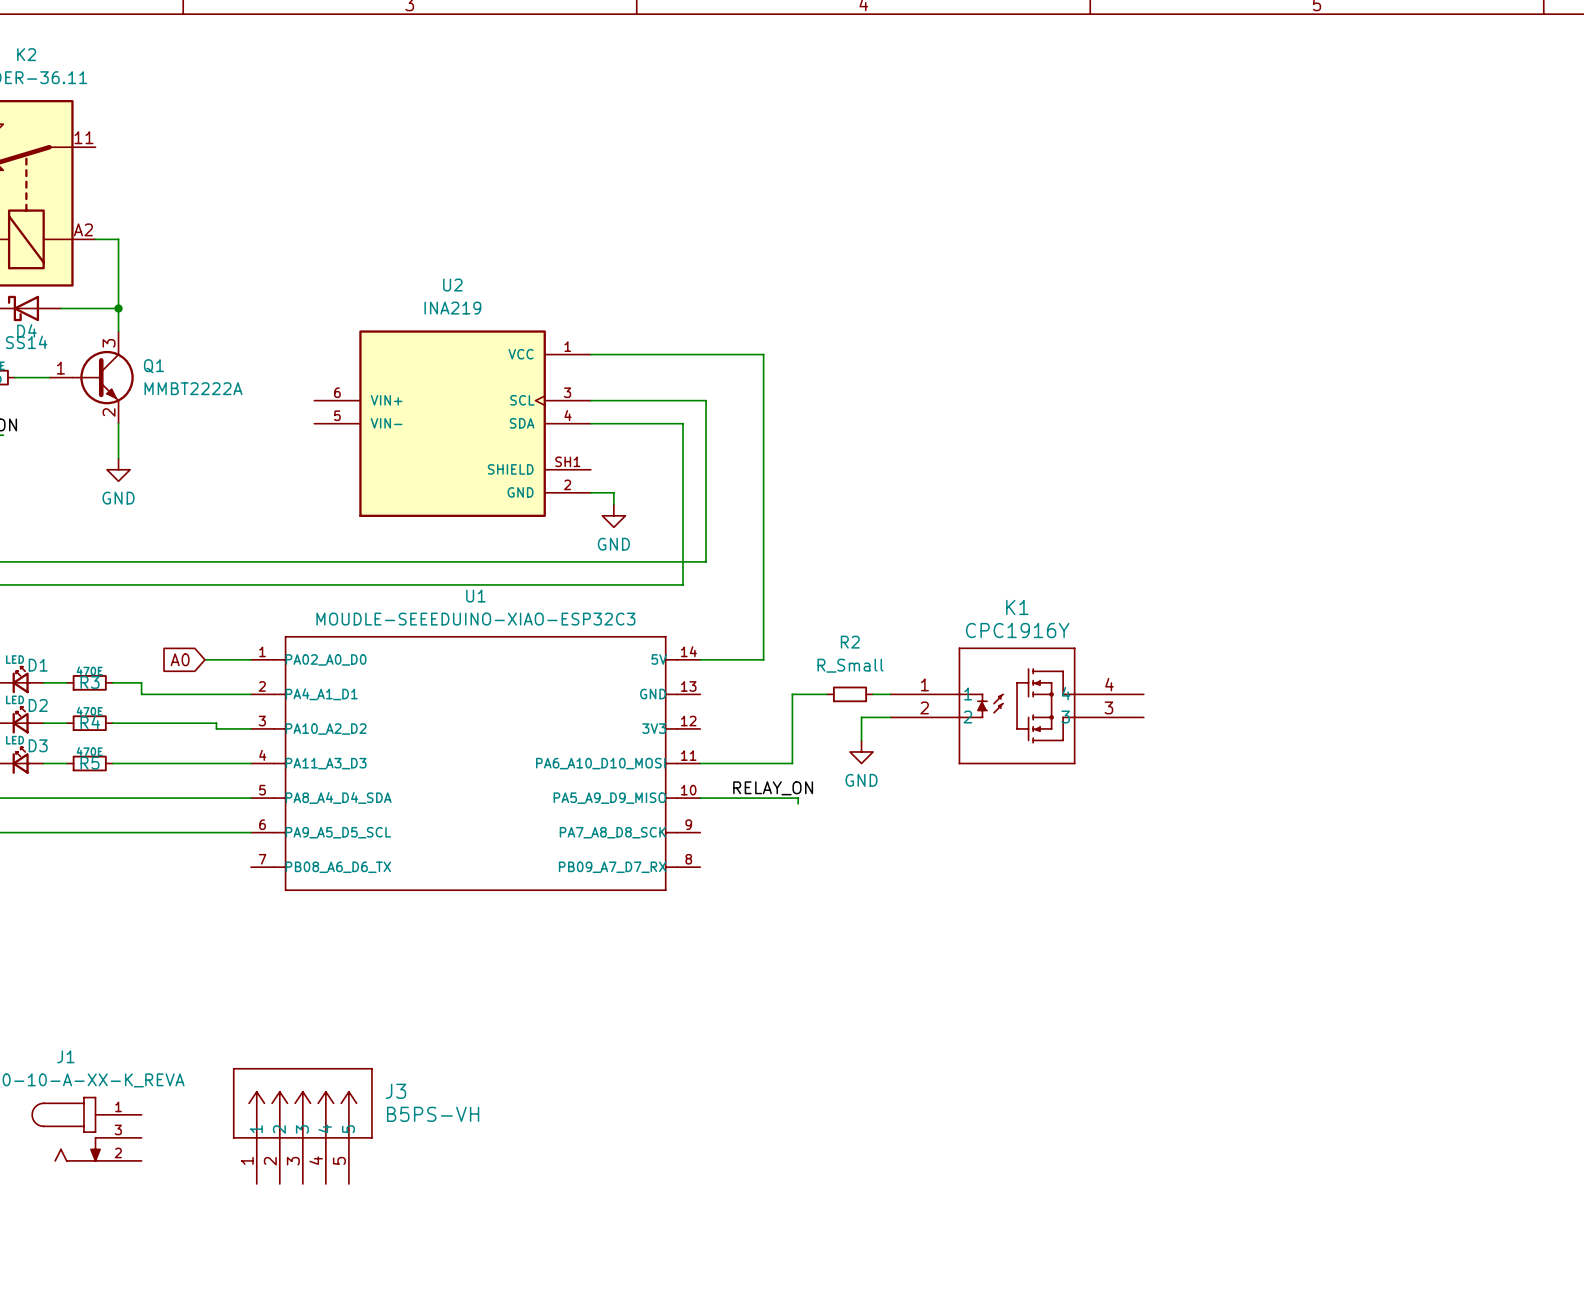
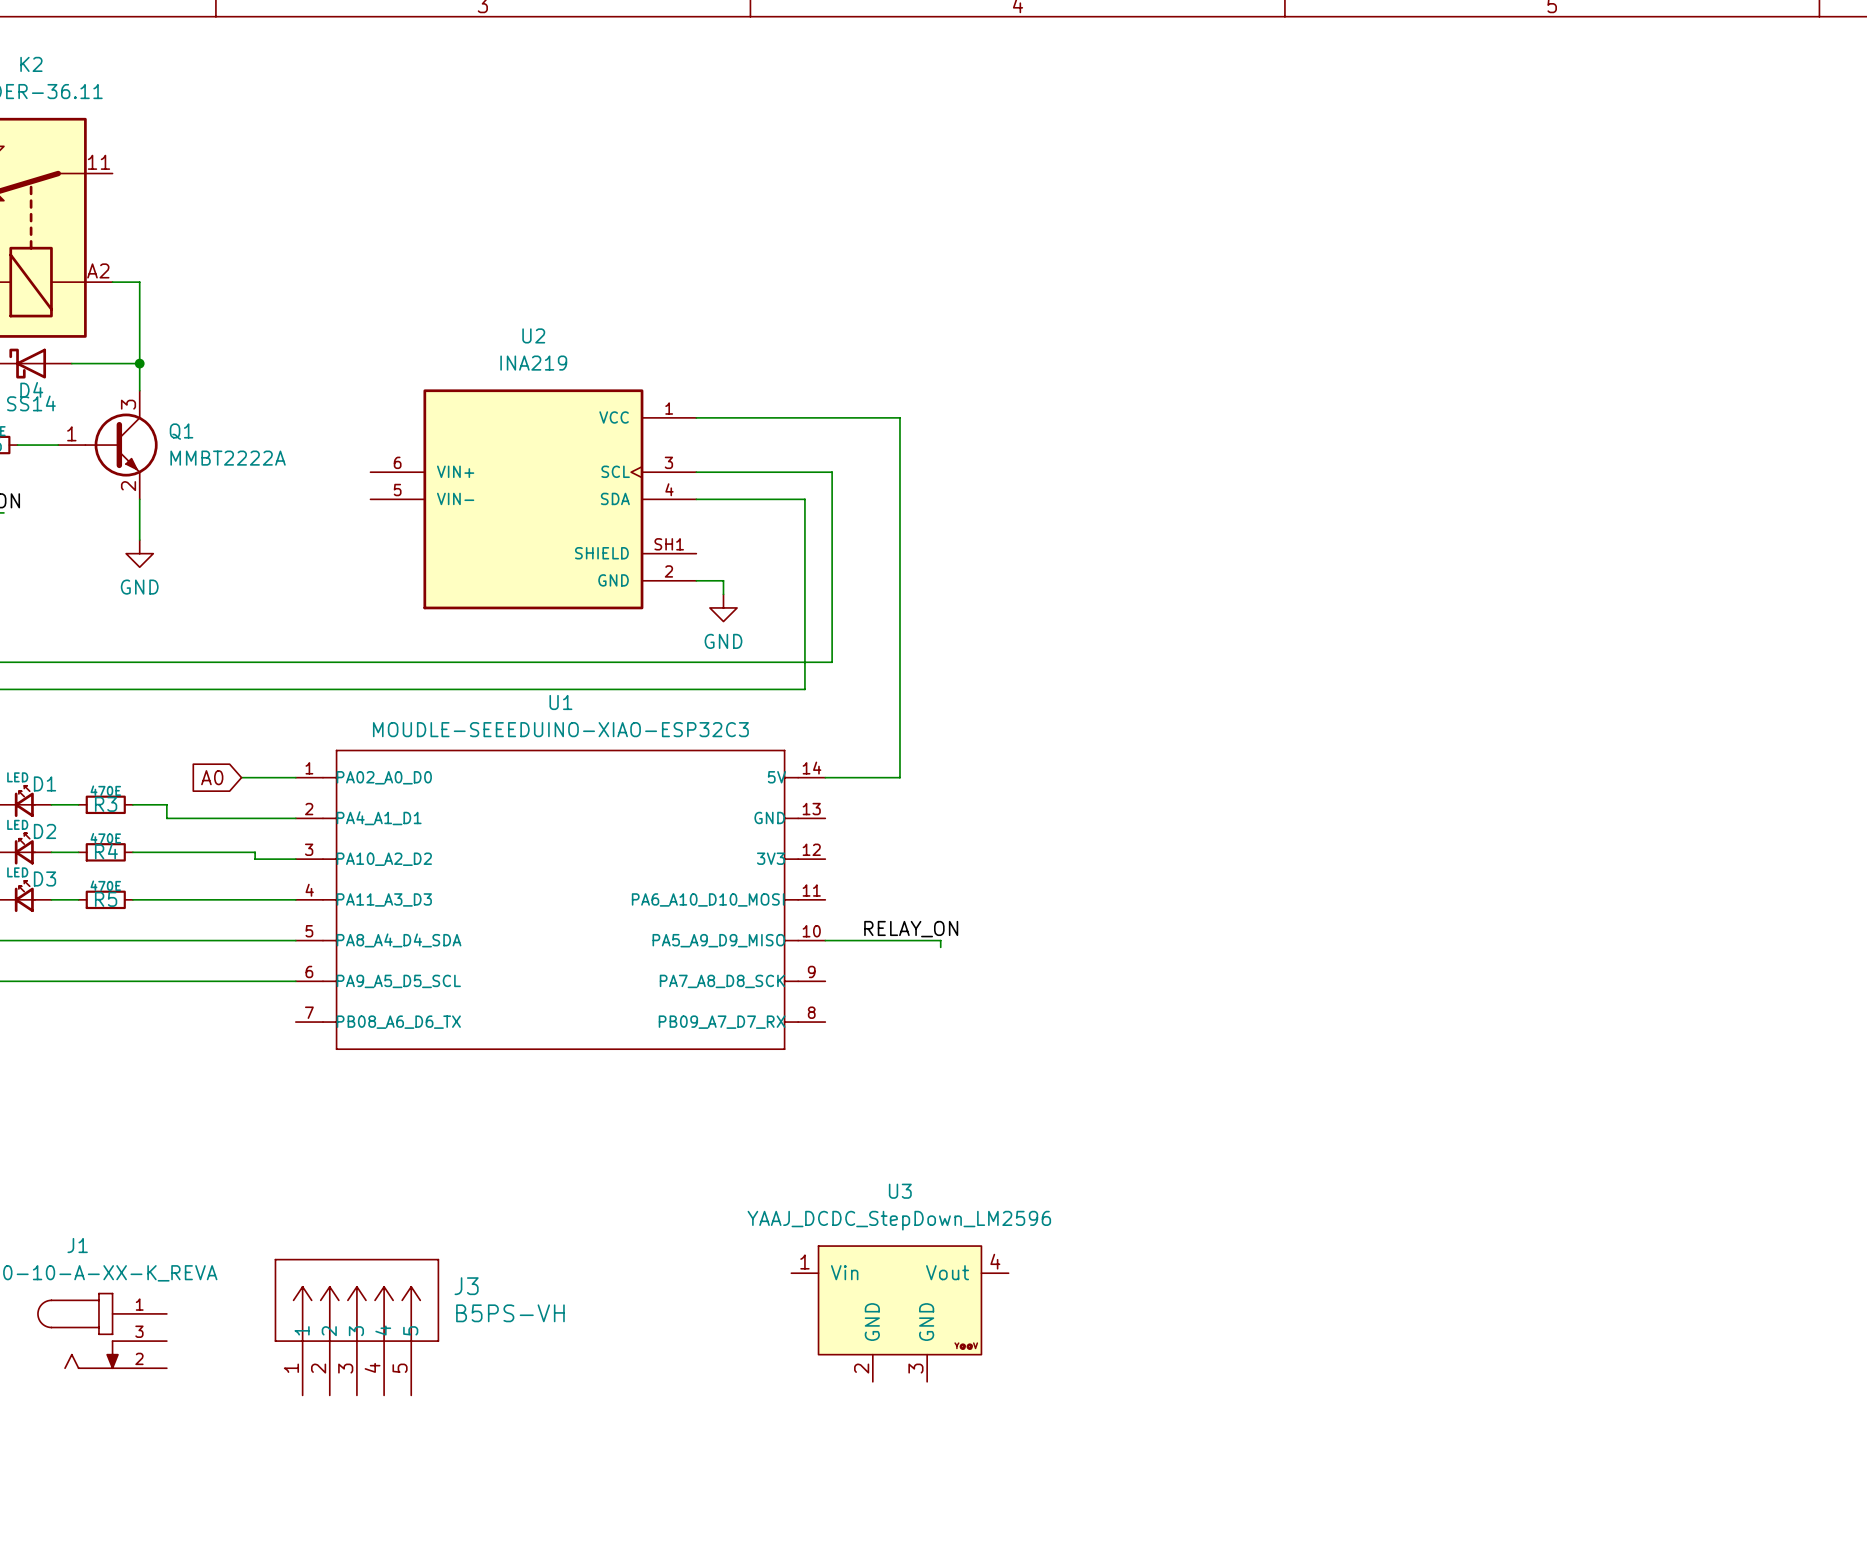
wire: (826, 694) (792, 694) (792, 763) (700, 763) -> none
R2: R_Small (850, 694) -> none
wire: (873, 694) (890, 694) -> none
K1: CPC1916Y (1017, 705) -> none
wire: (890, 717) (861, 717) (861, 740) -> none
power symbol: GND (861, 751) -> none
U3: none -> YAAJ_DCDC_StepDown_LM2596 (899, 1313)

